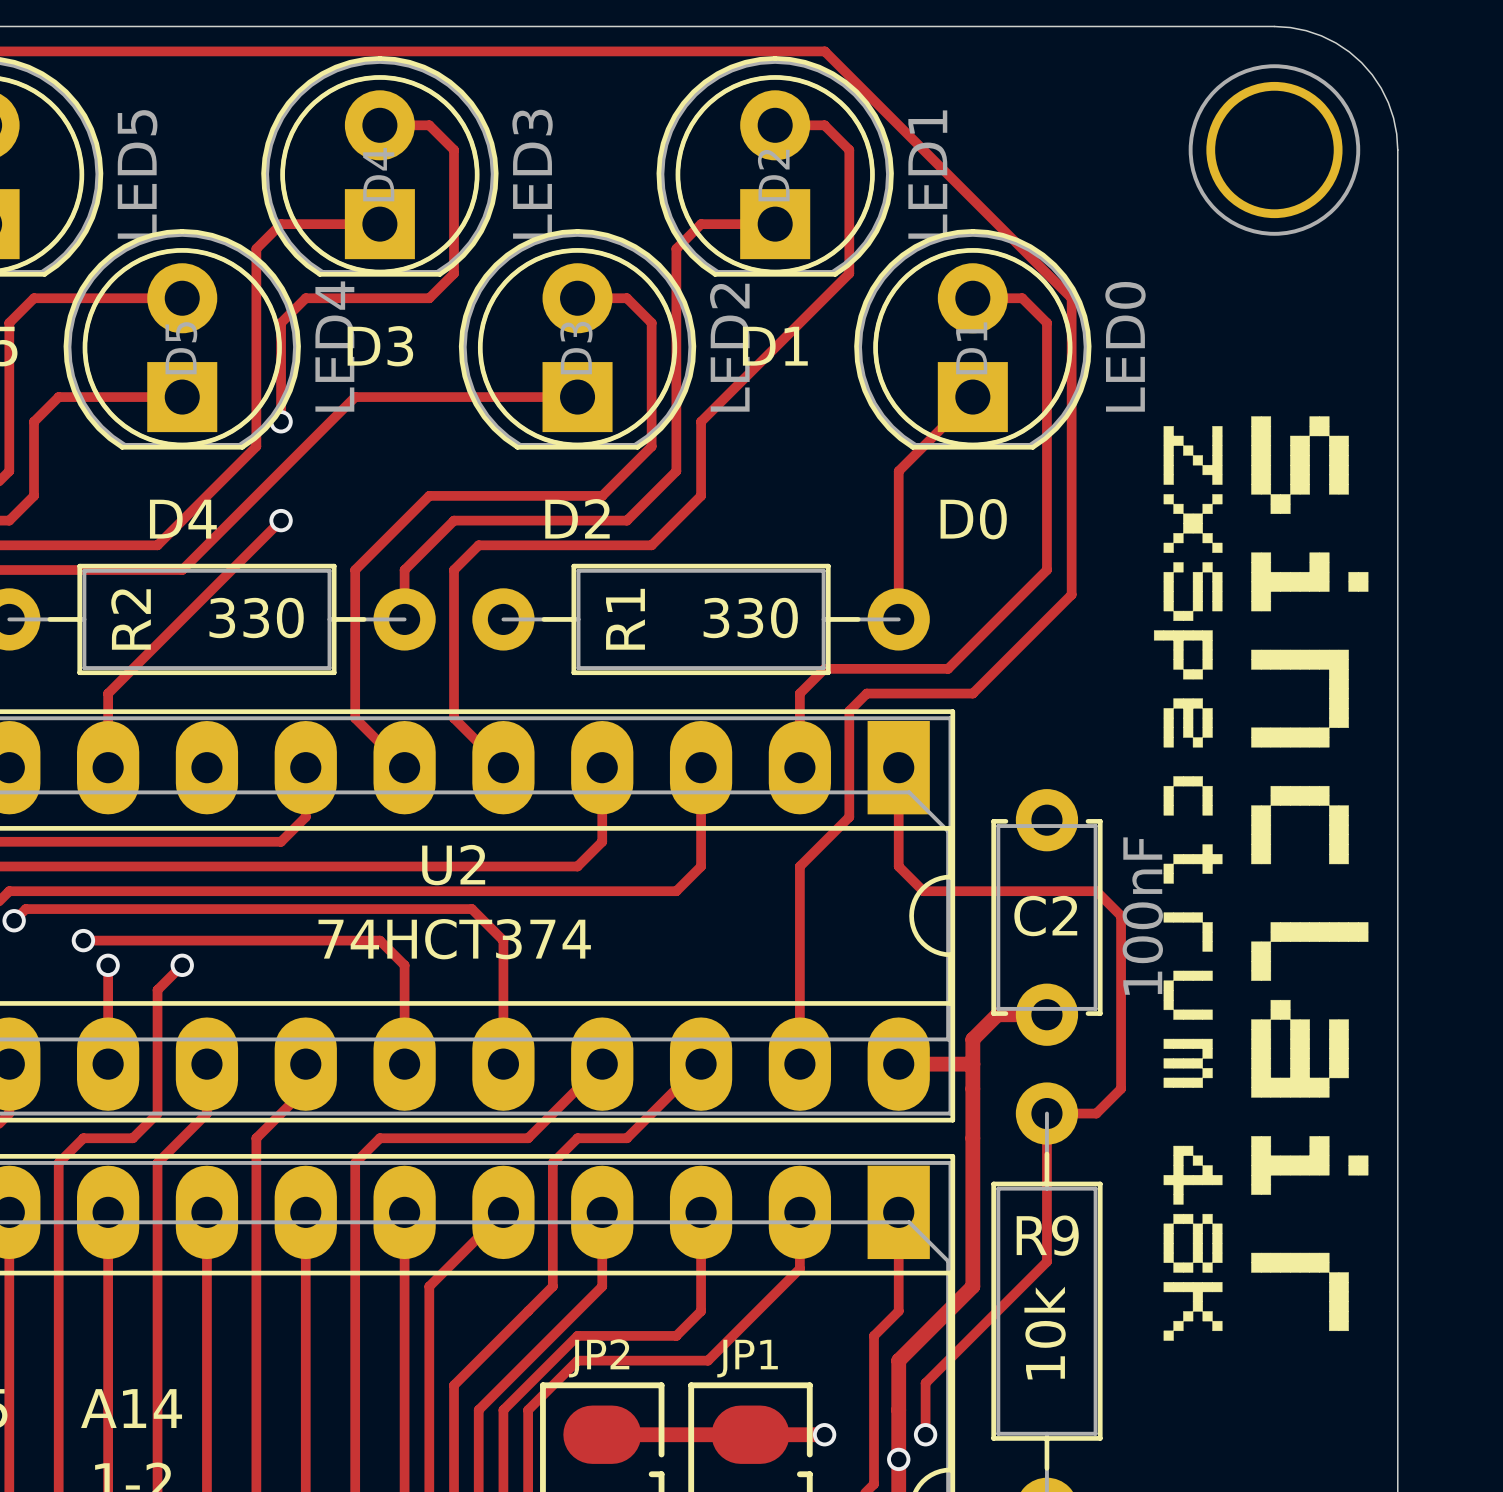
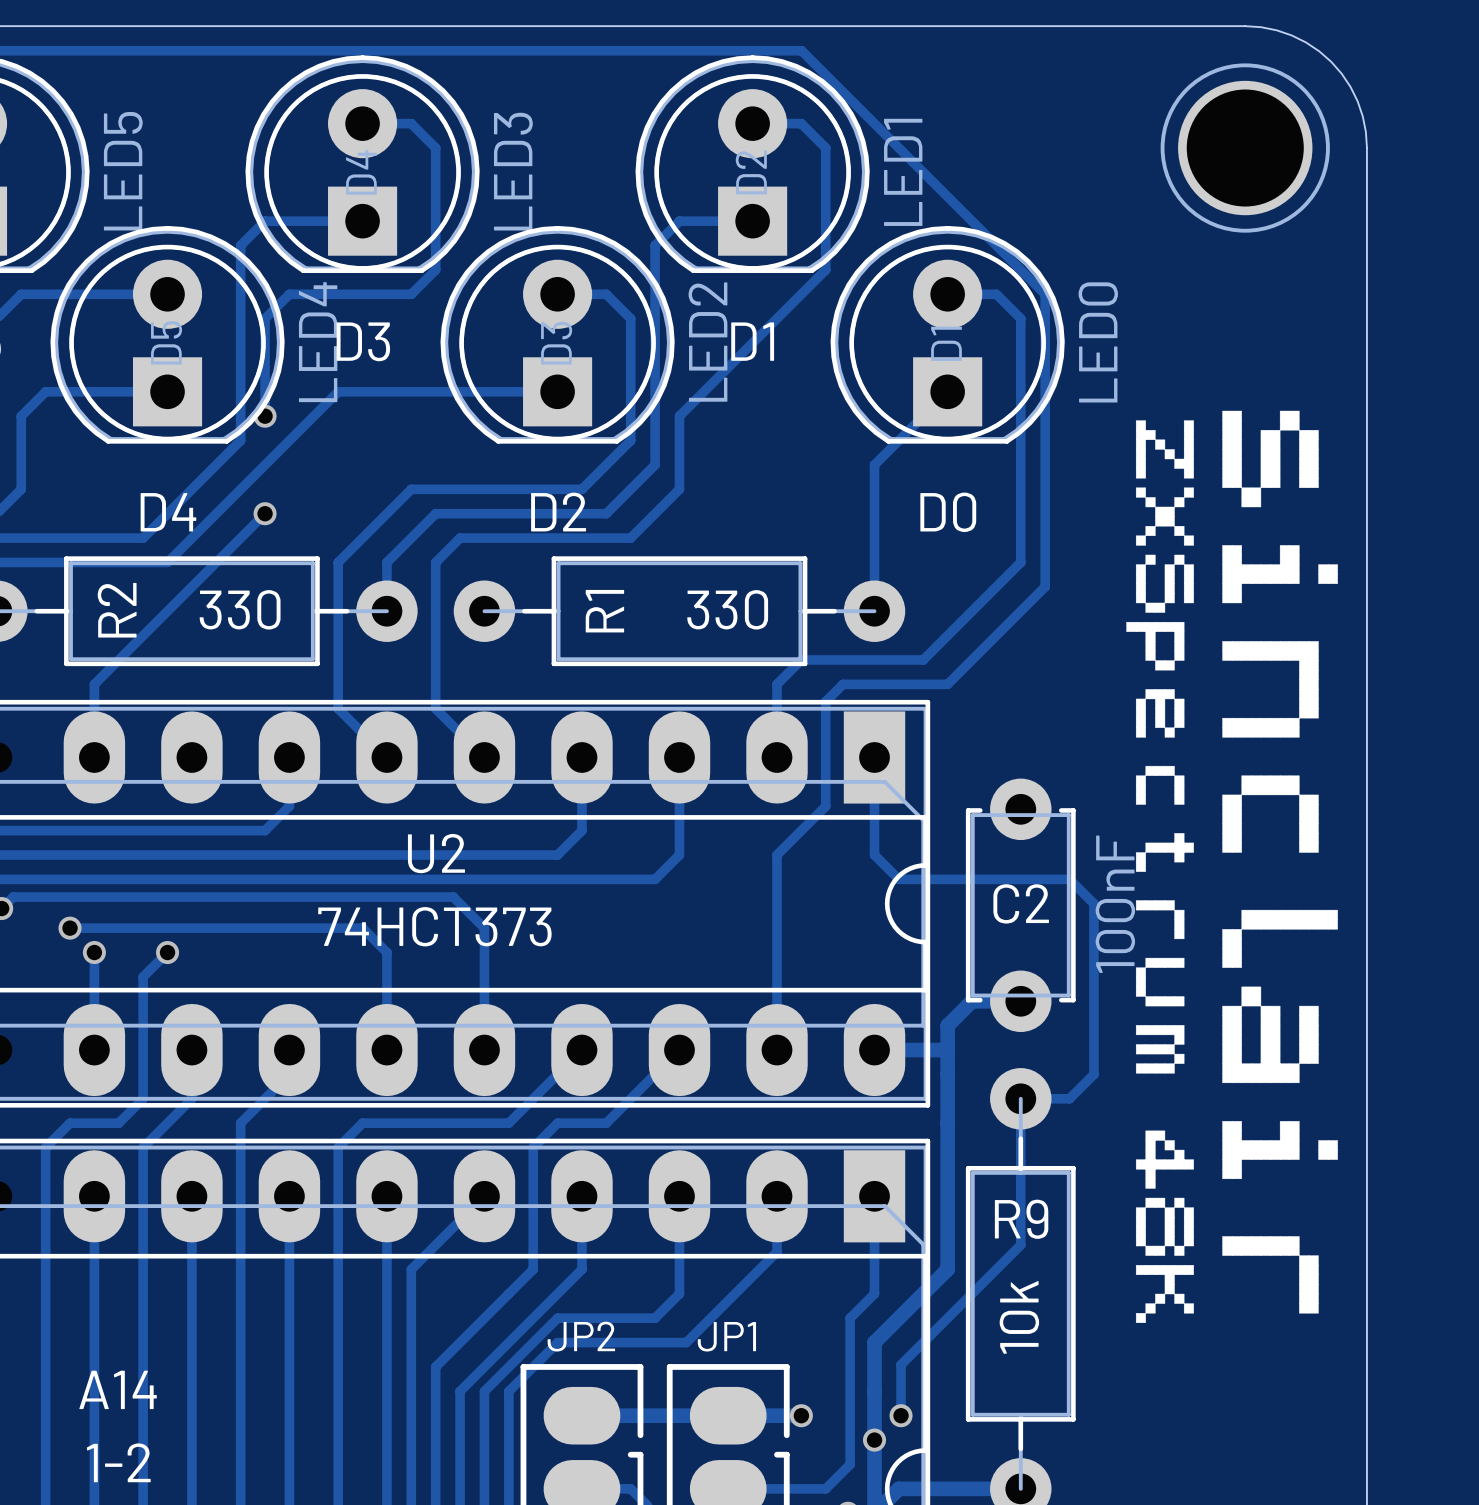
U2 value: 74HCT374 (454, 939) -> 74HCT373 (434, 926)

